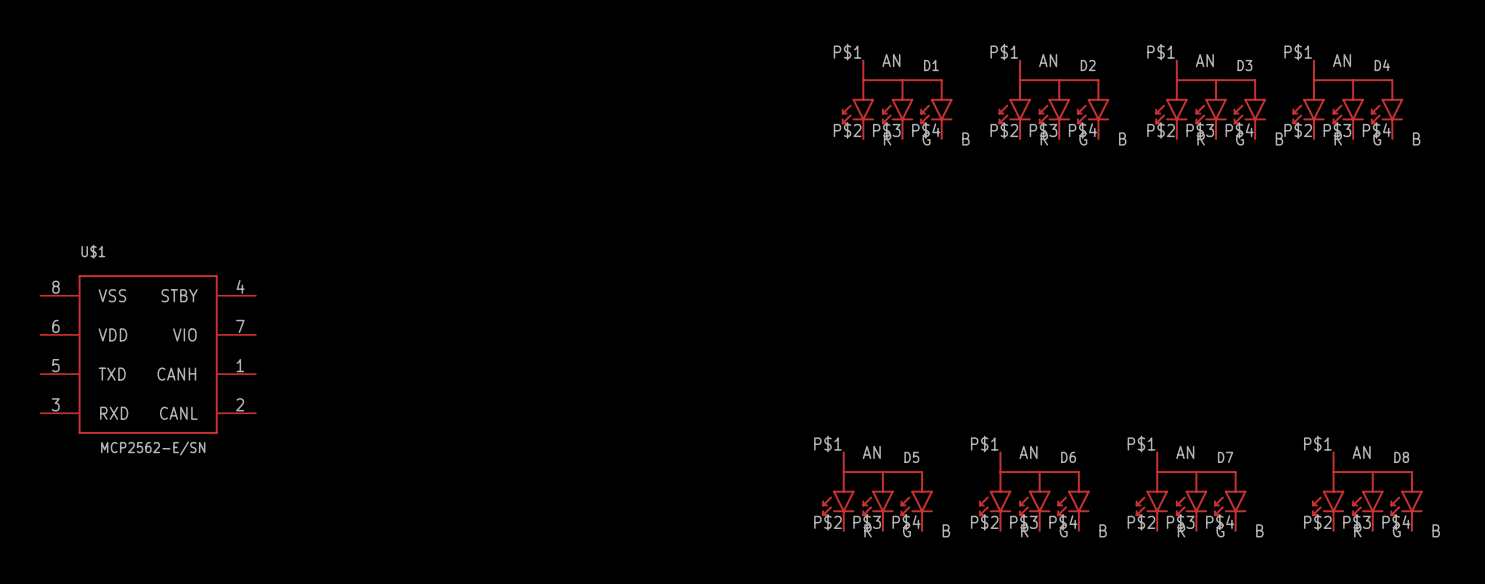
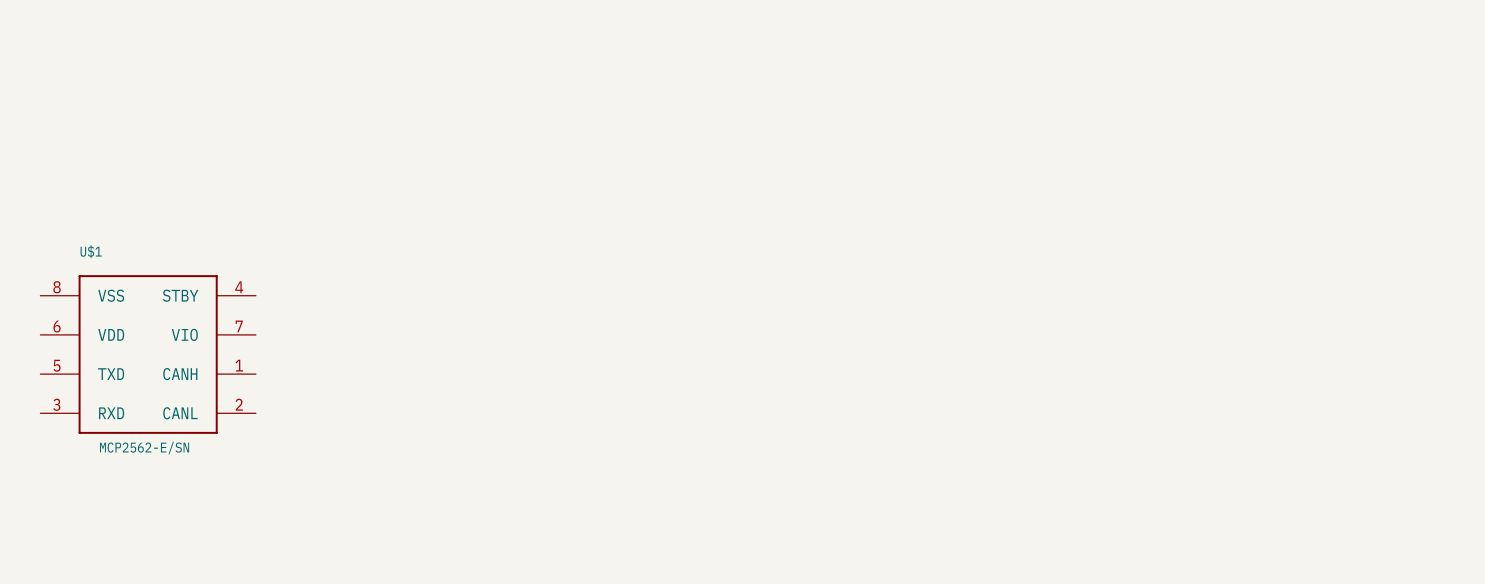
D1: (897, 99) -> none
D2: (1053, 99) -> none
D3: (1210, 99) -> none
D4: (1347, 99) -> none
D5: (877, 491) -> none
D6: (1034, 491) -> none
D7: (1191, 491) -> none
D8: (1367, 491) -> none

